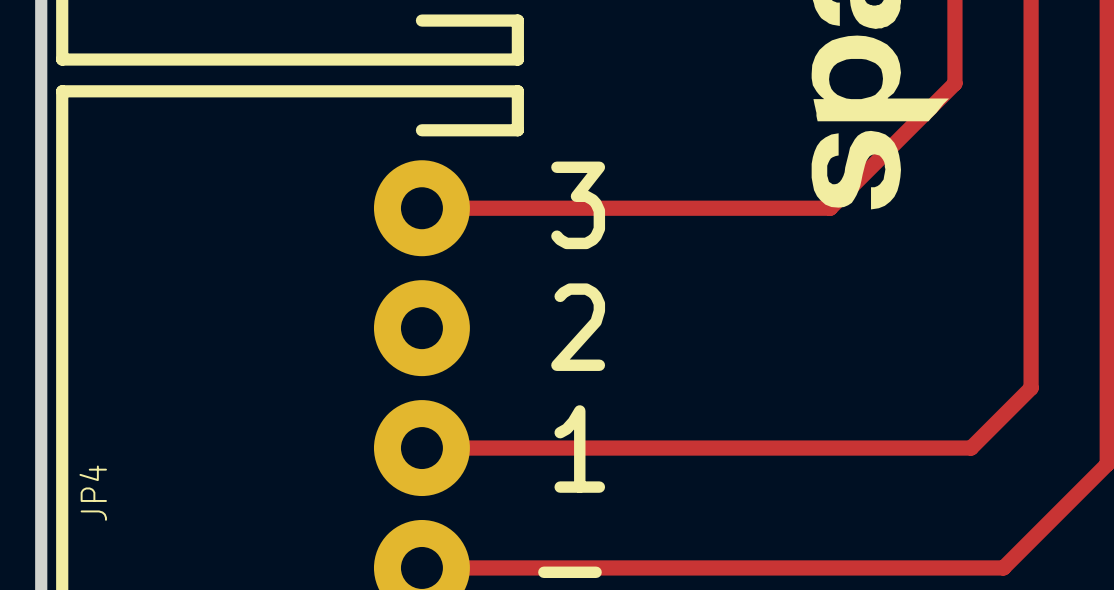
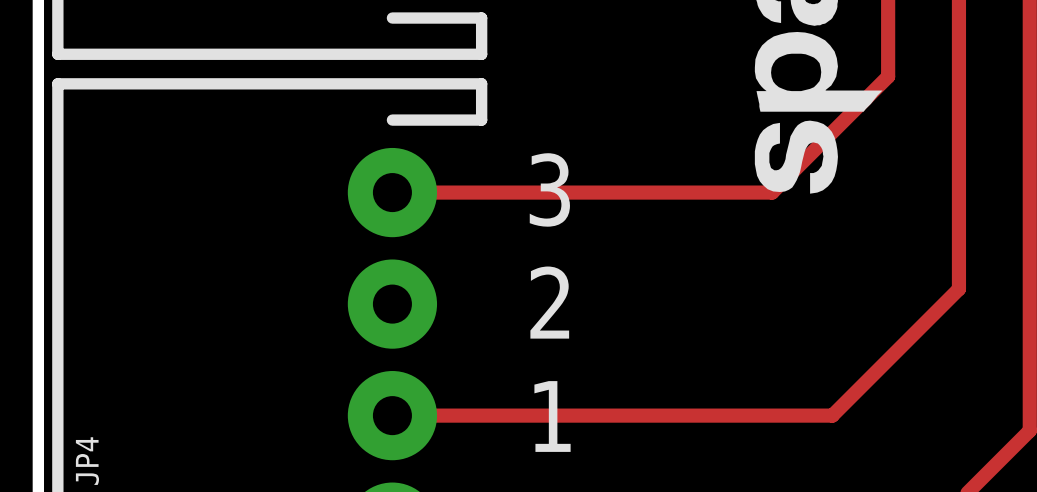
track: (1031, 311) (1031, 388) (971, 448) (894, 448) -> (958, 289) (832, 415)

